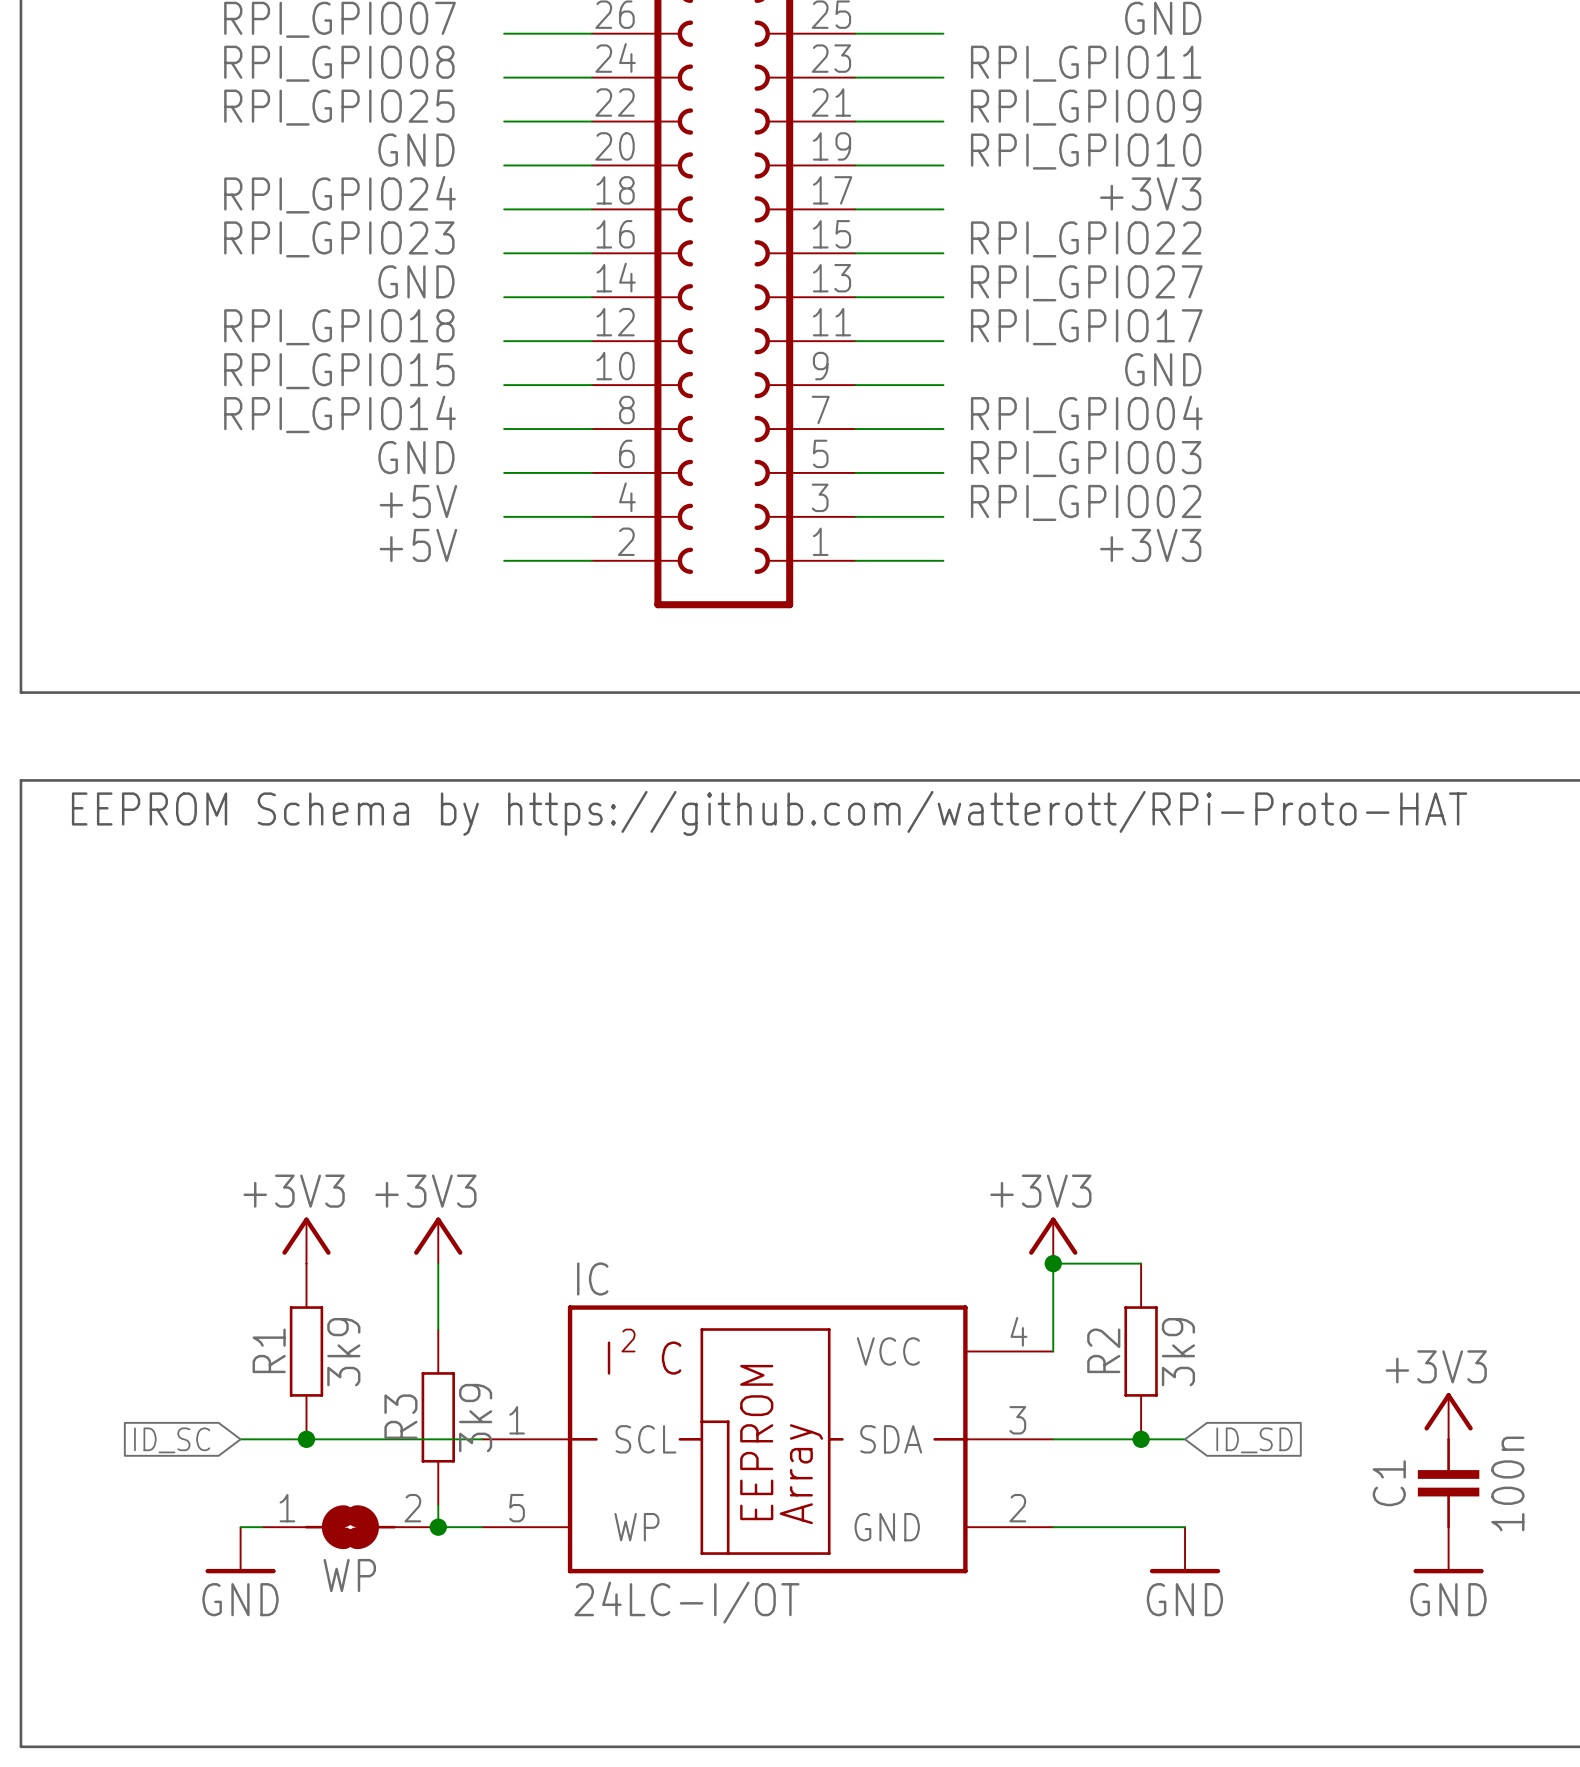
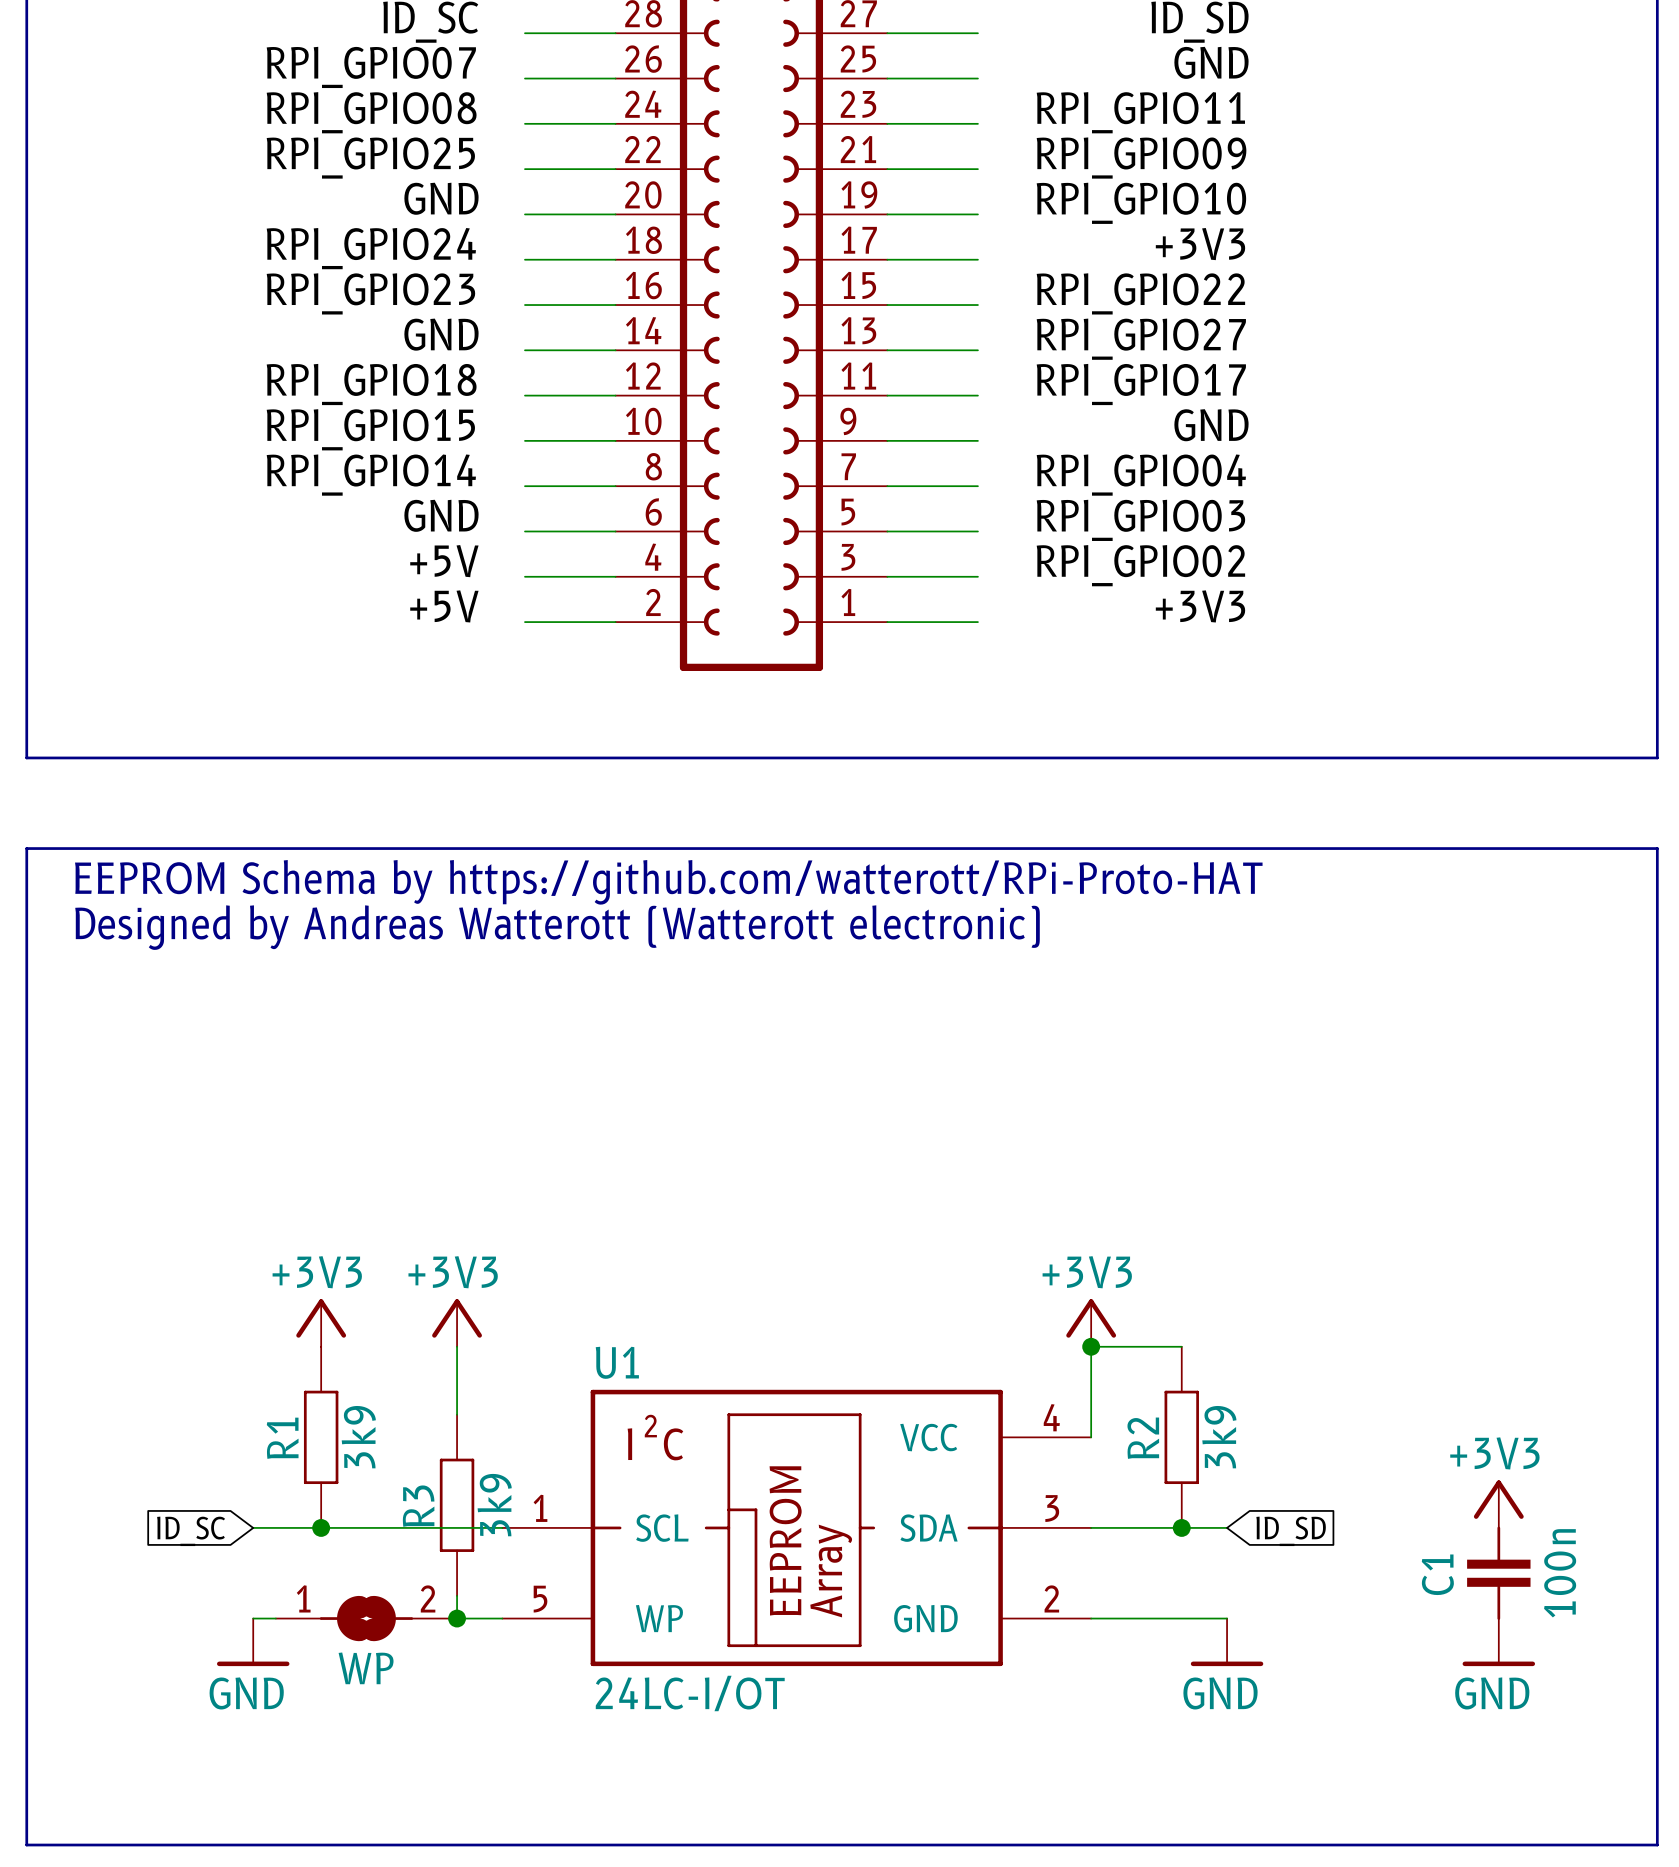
text: none -> Designed by Andreas Watterott (Watterott electronic) (557, 927)
IC name: IC (592, 1279) -> U1 (617, 1362)

